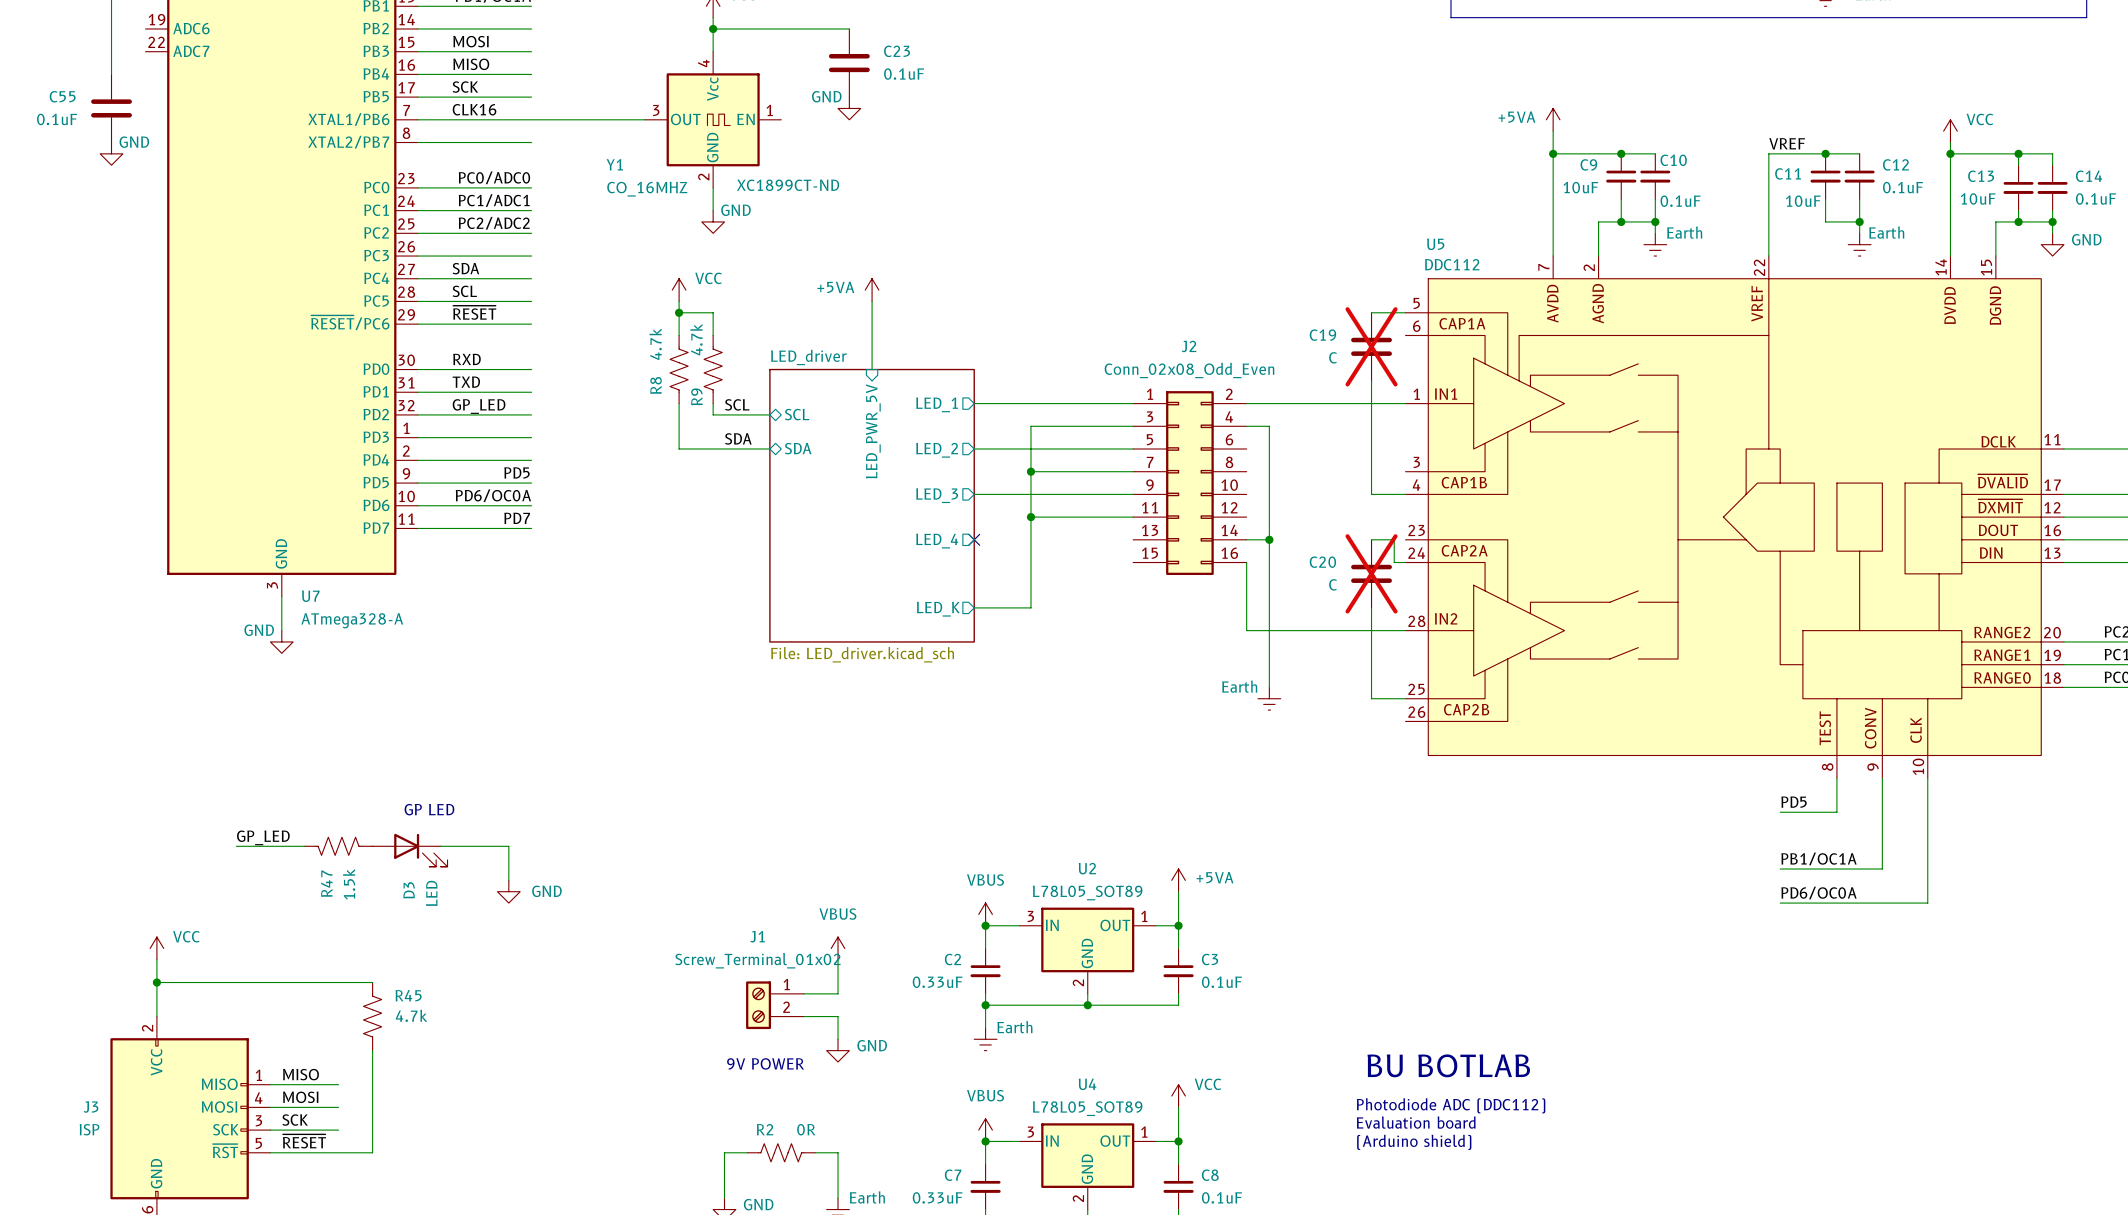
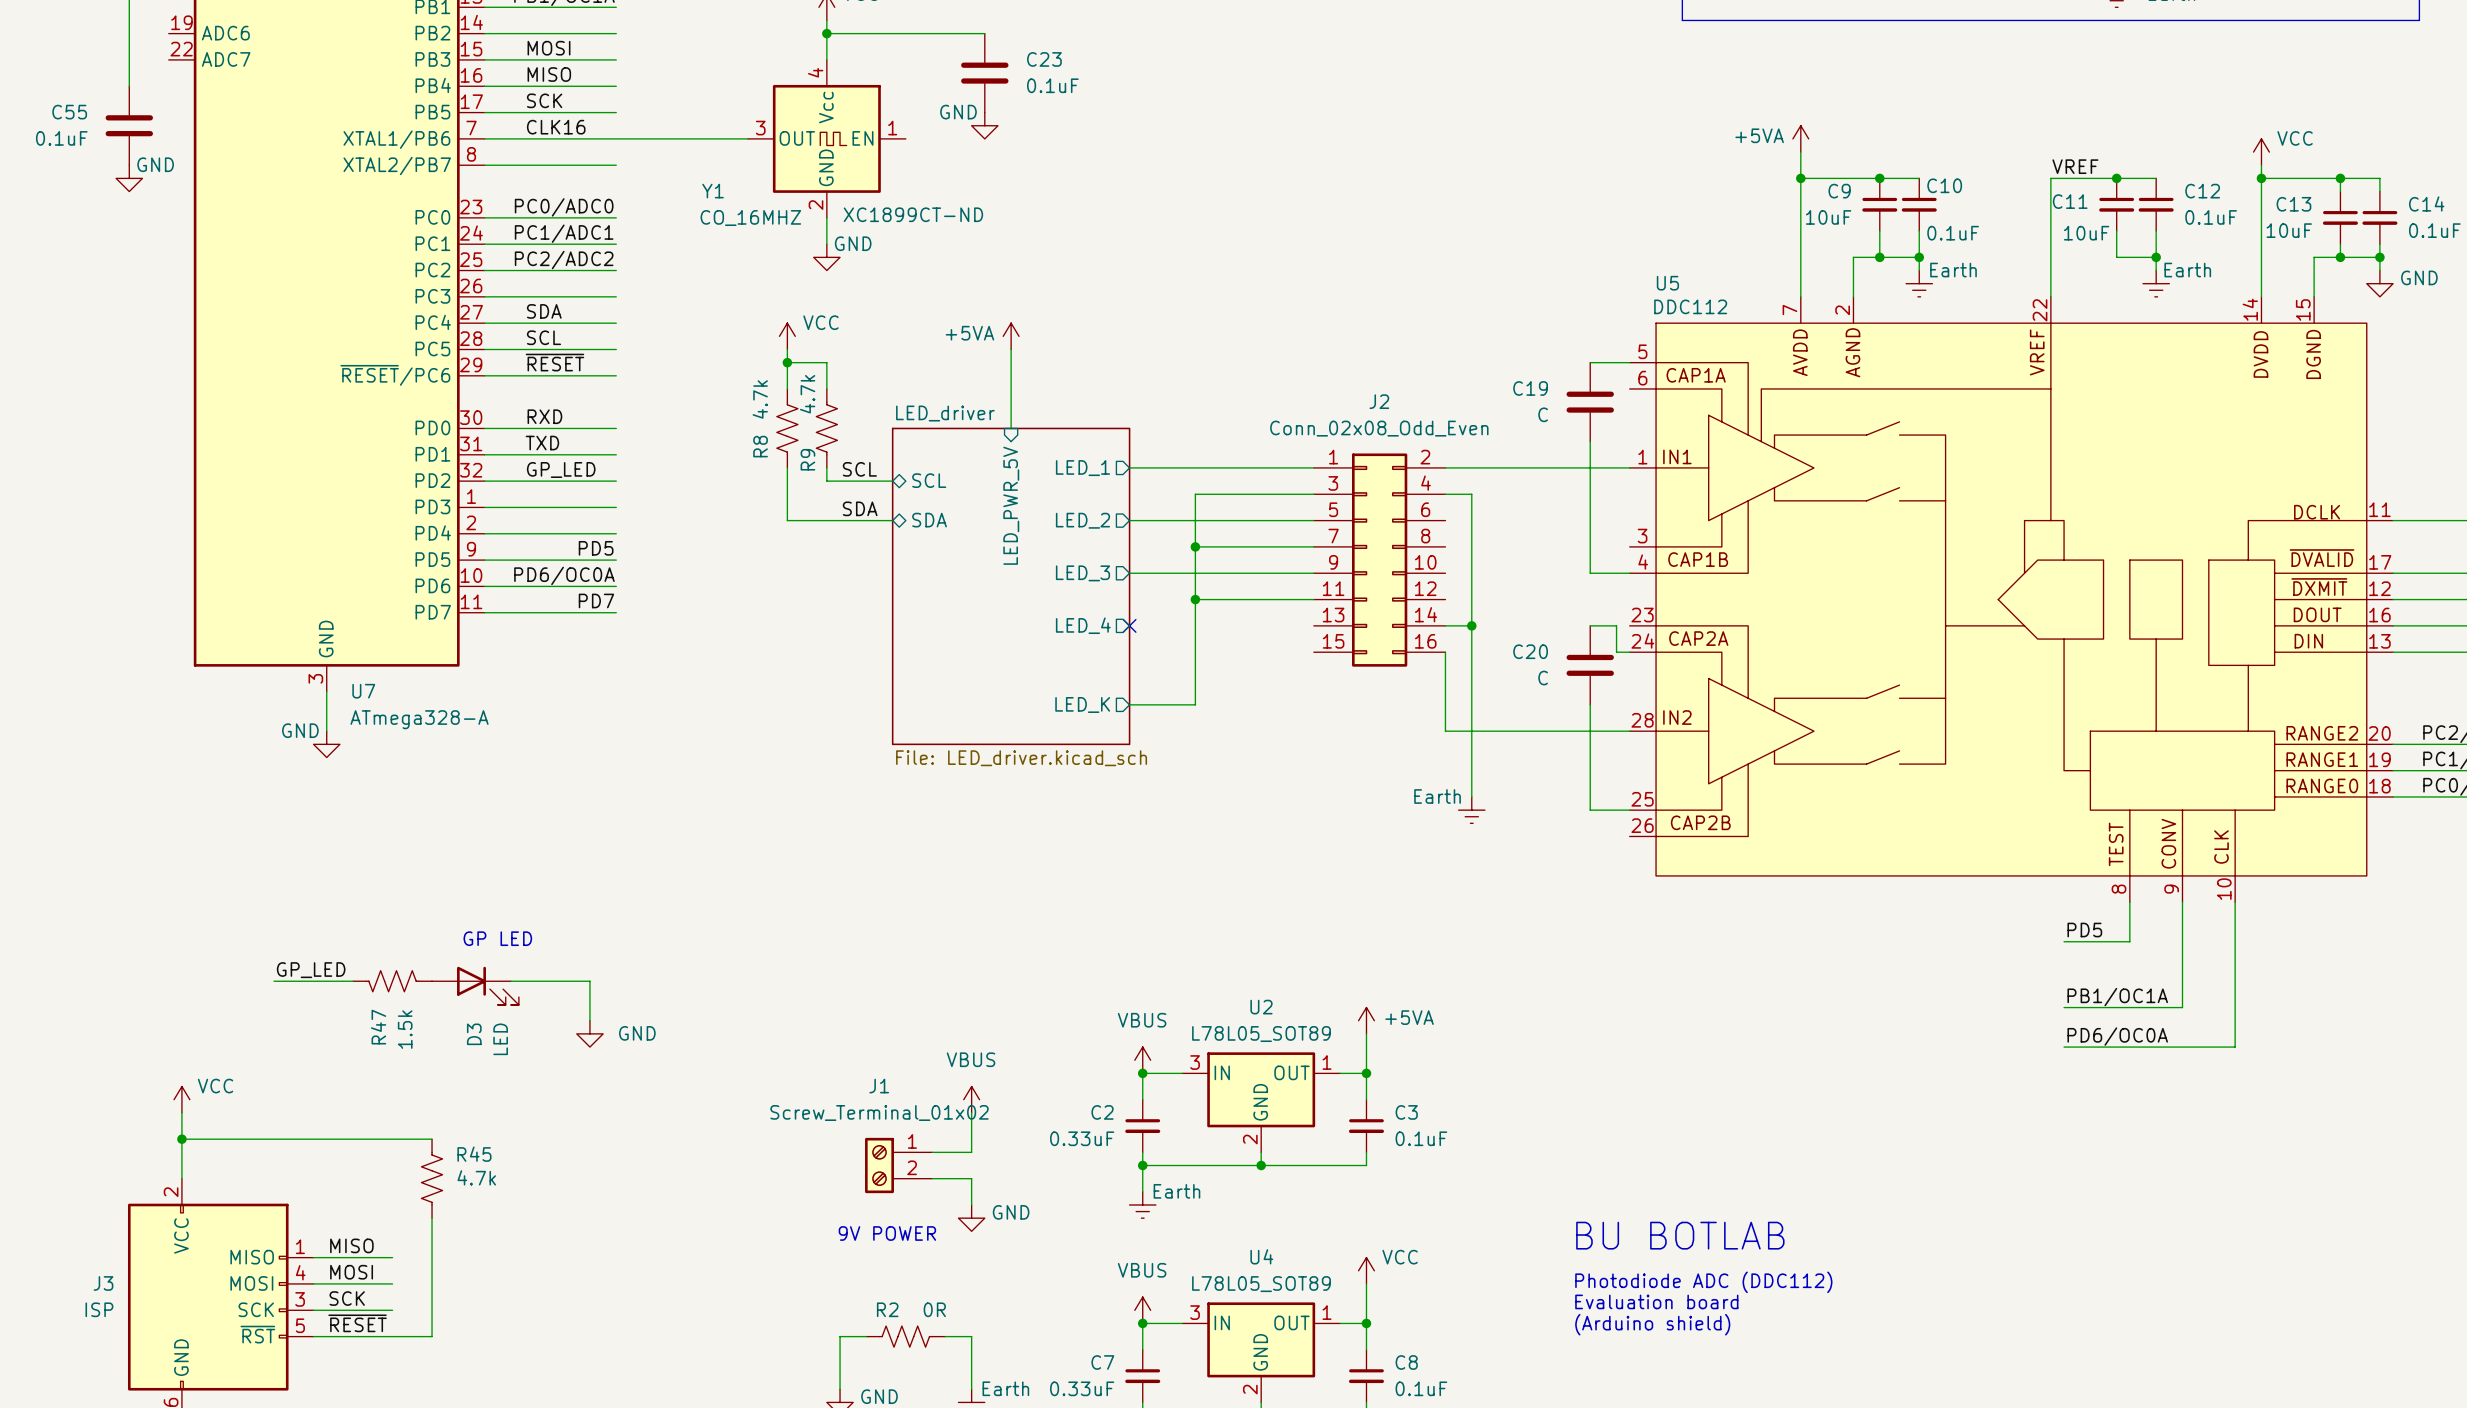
C19 do-not-place cross: (1371, 346) -> none
C20 do-not-place cross: (1371, 573) -> none

